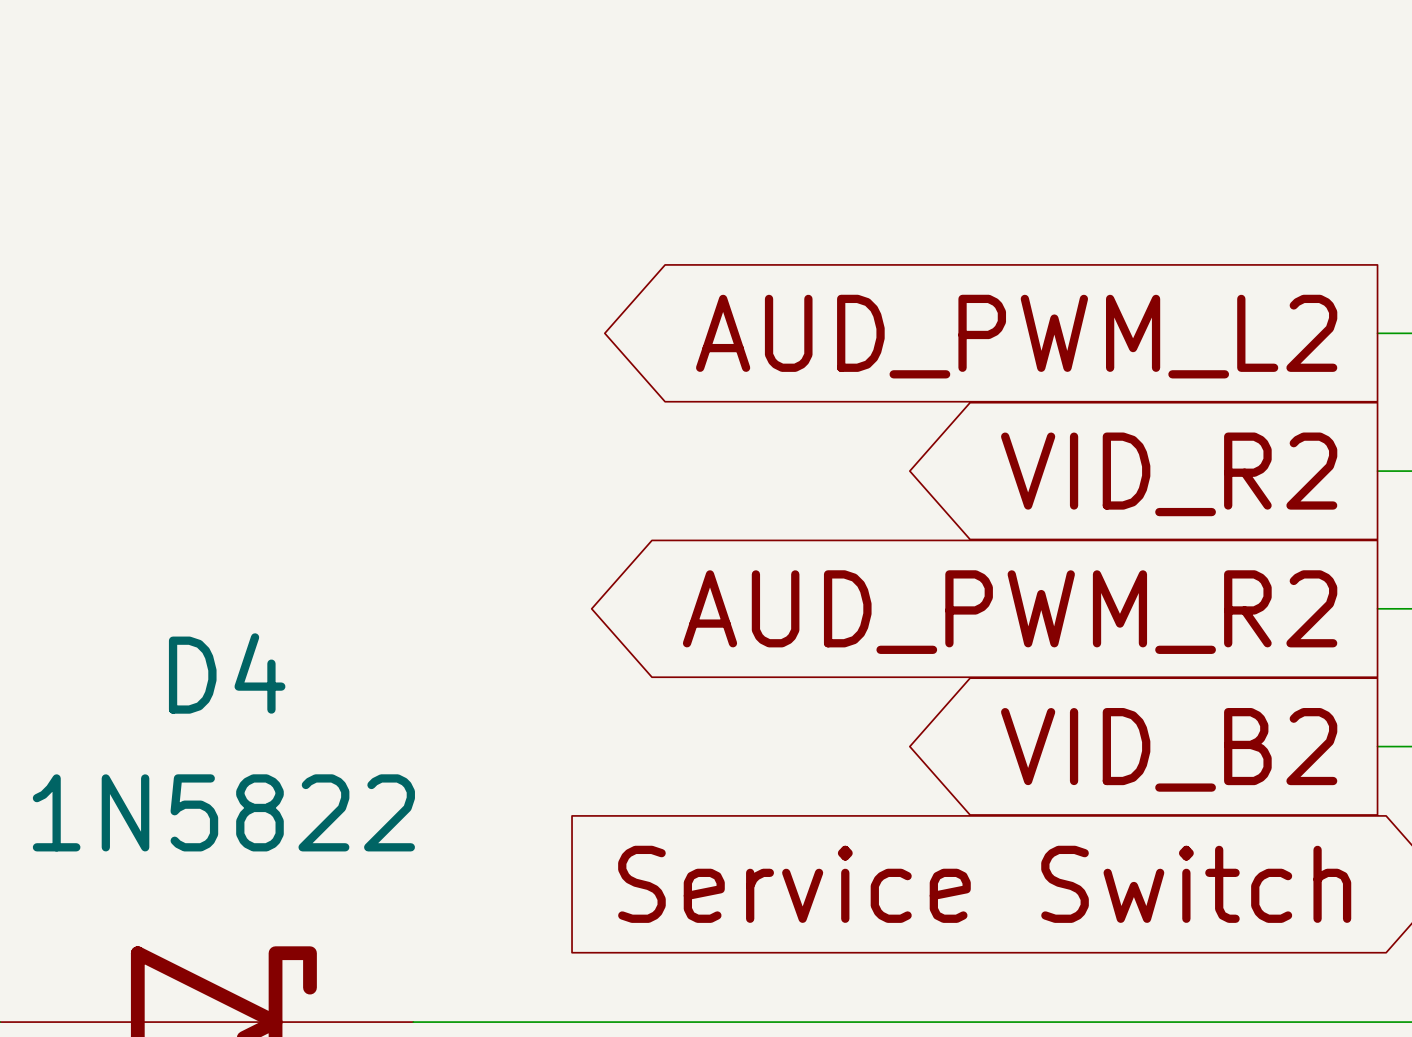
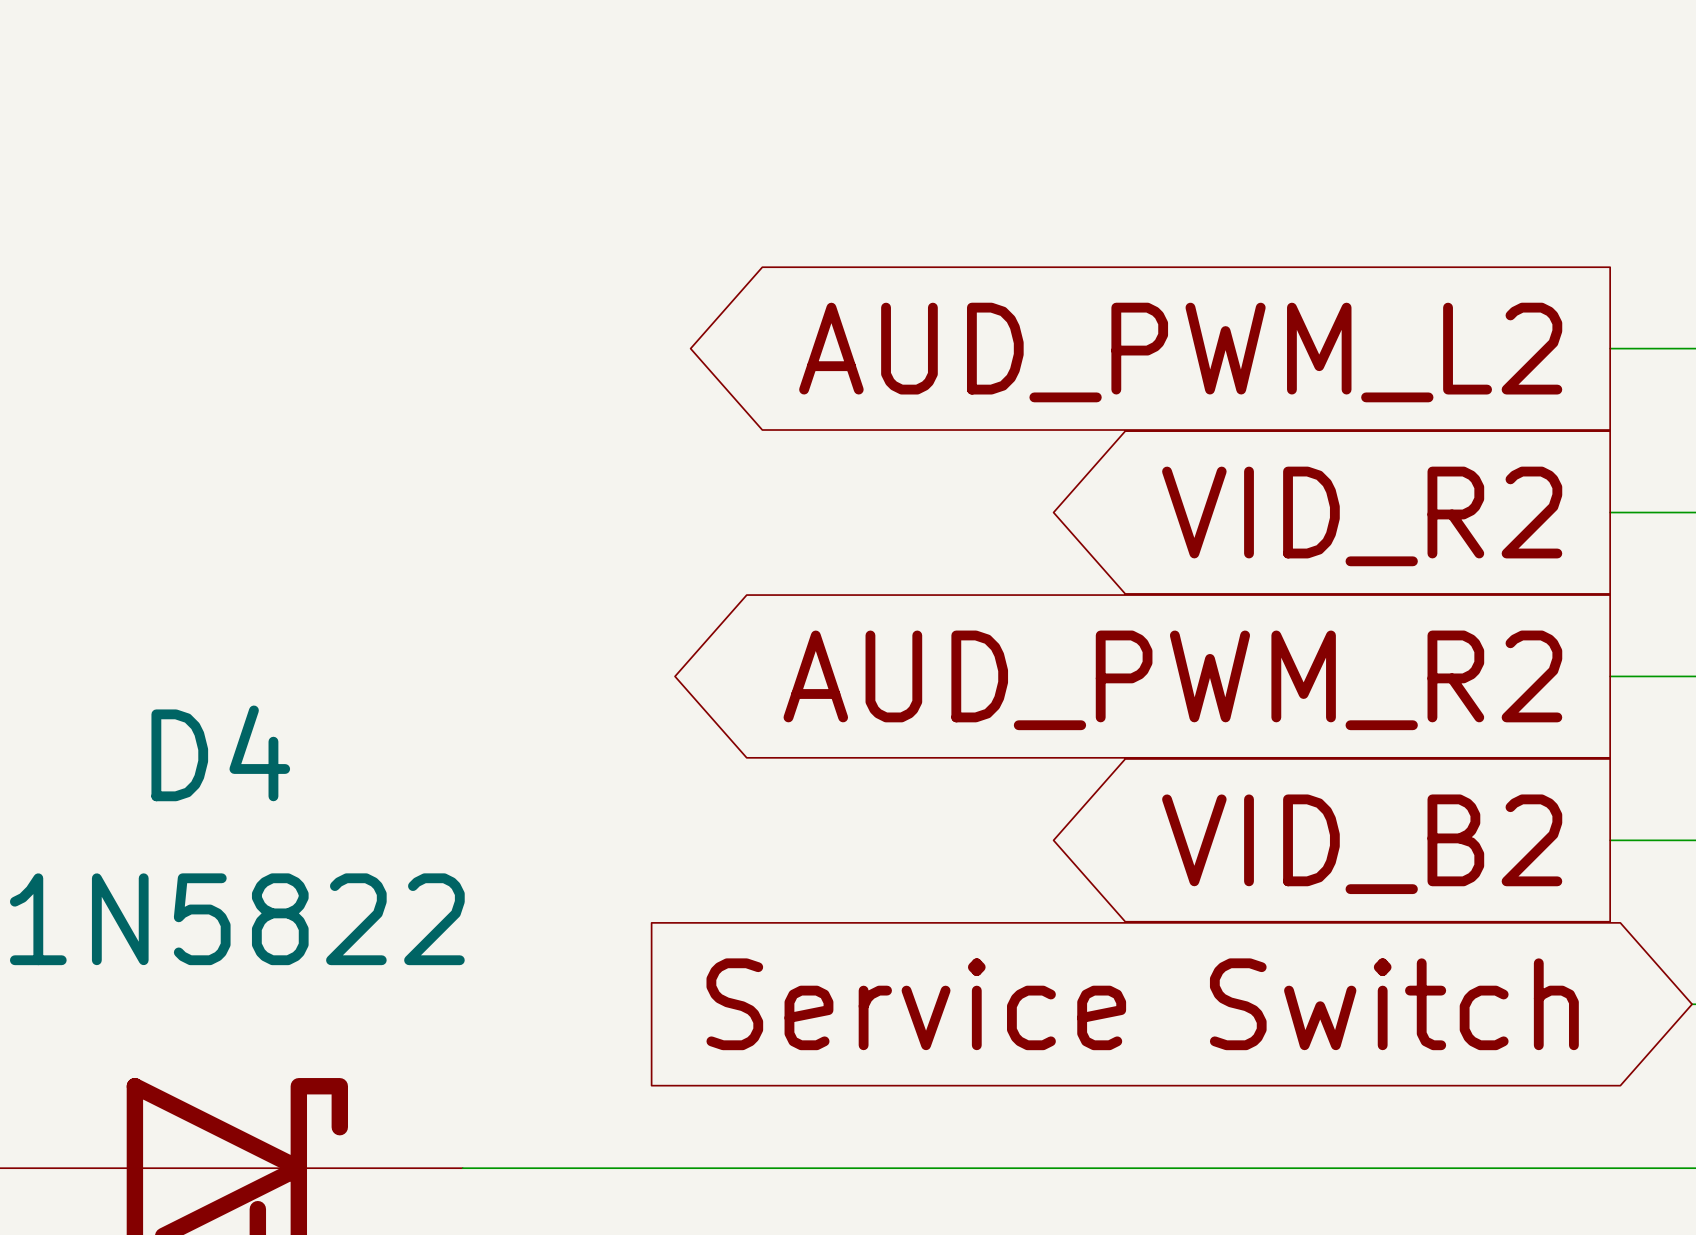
D4 name position: D4 (227, 673) -> D4 (220, 753)

